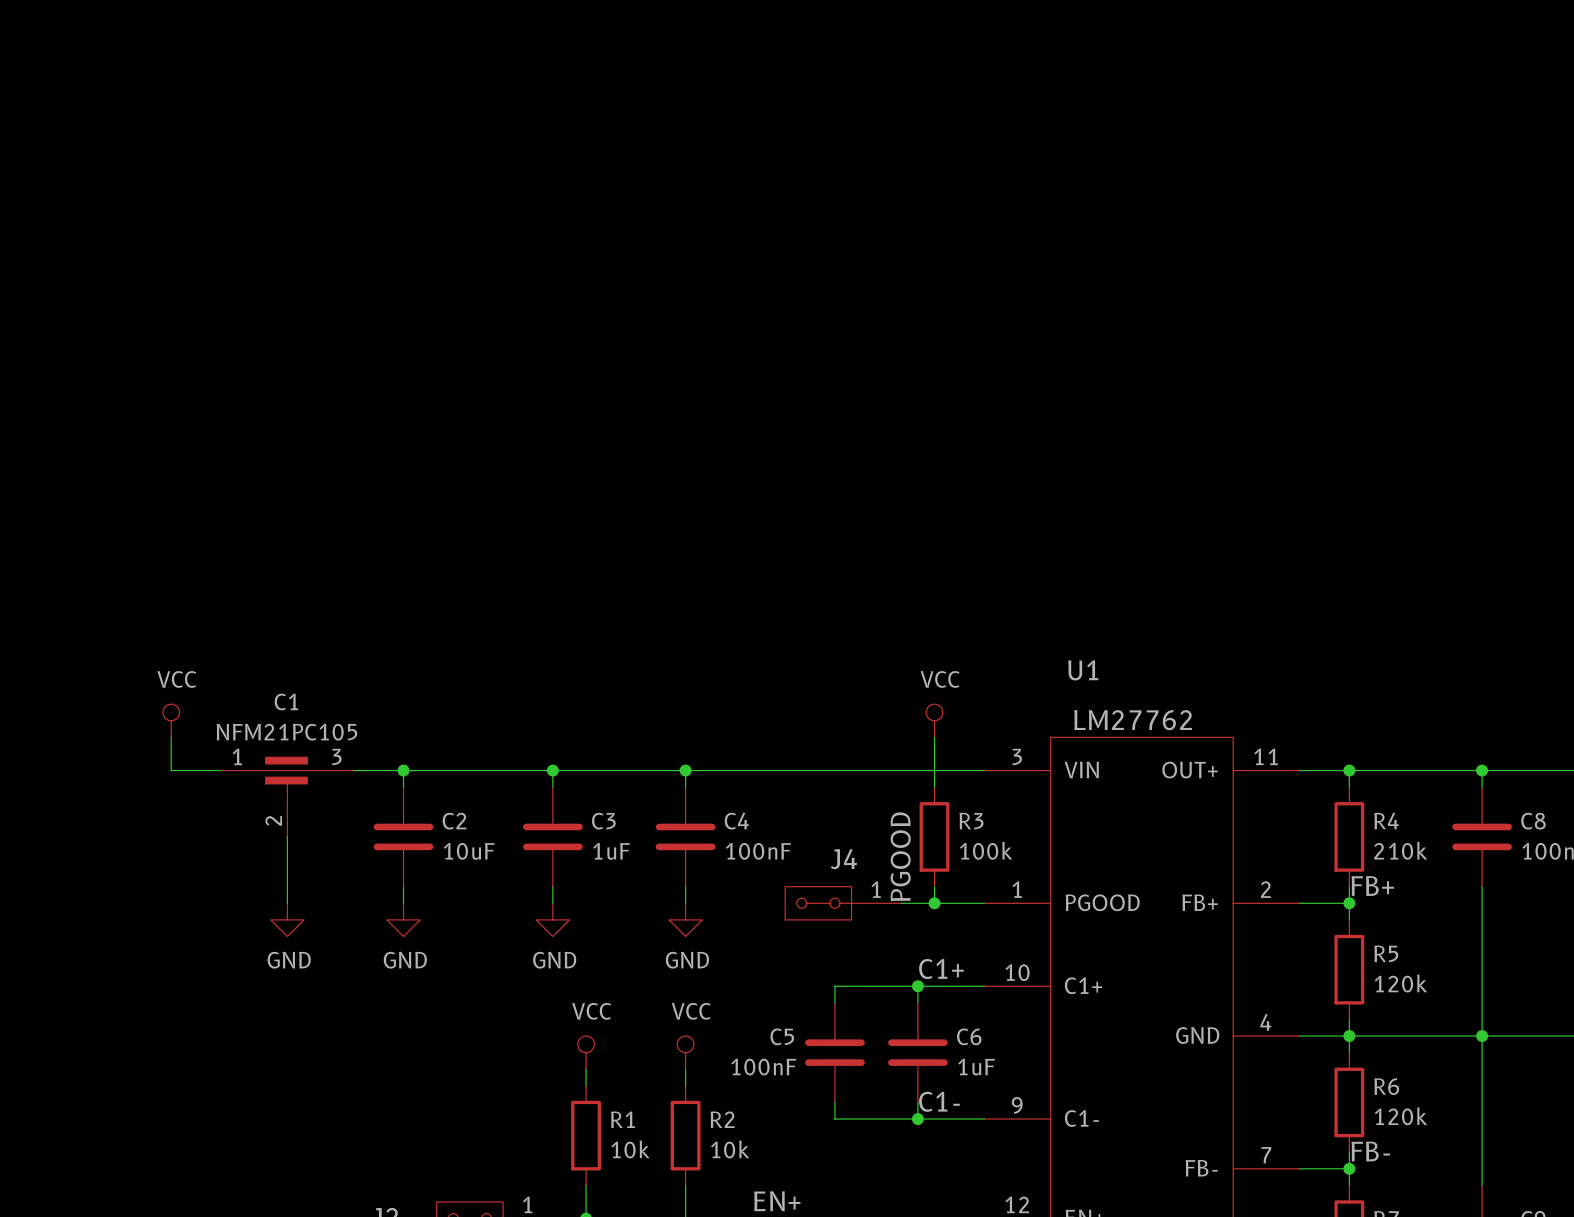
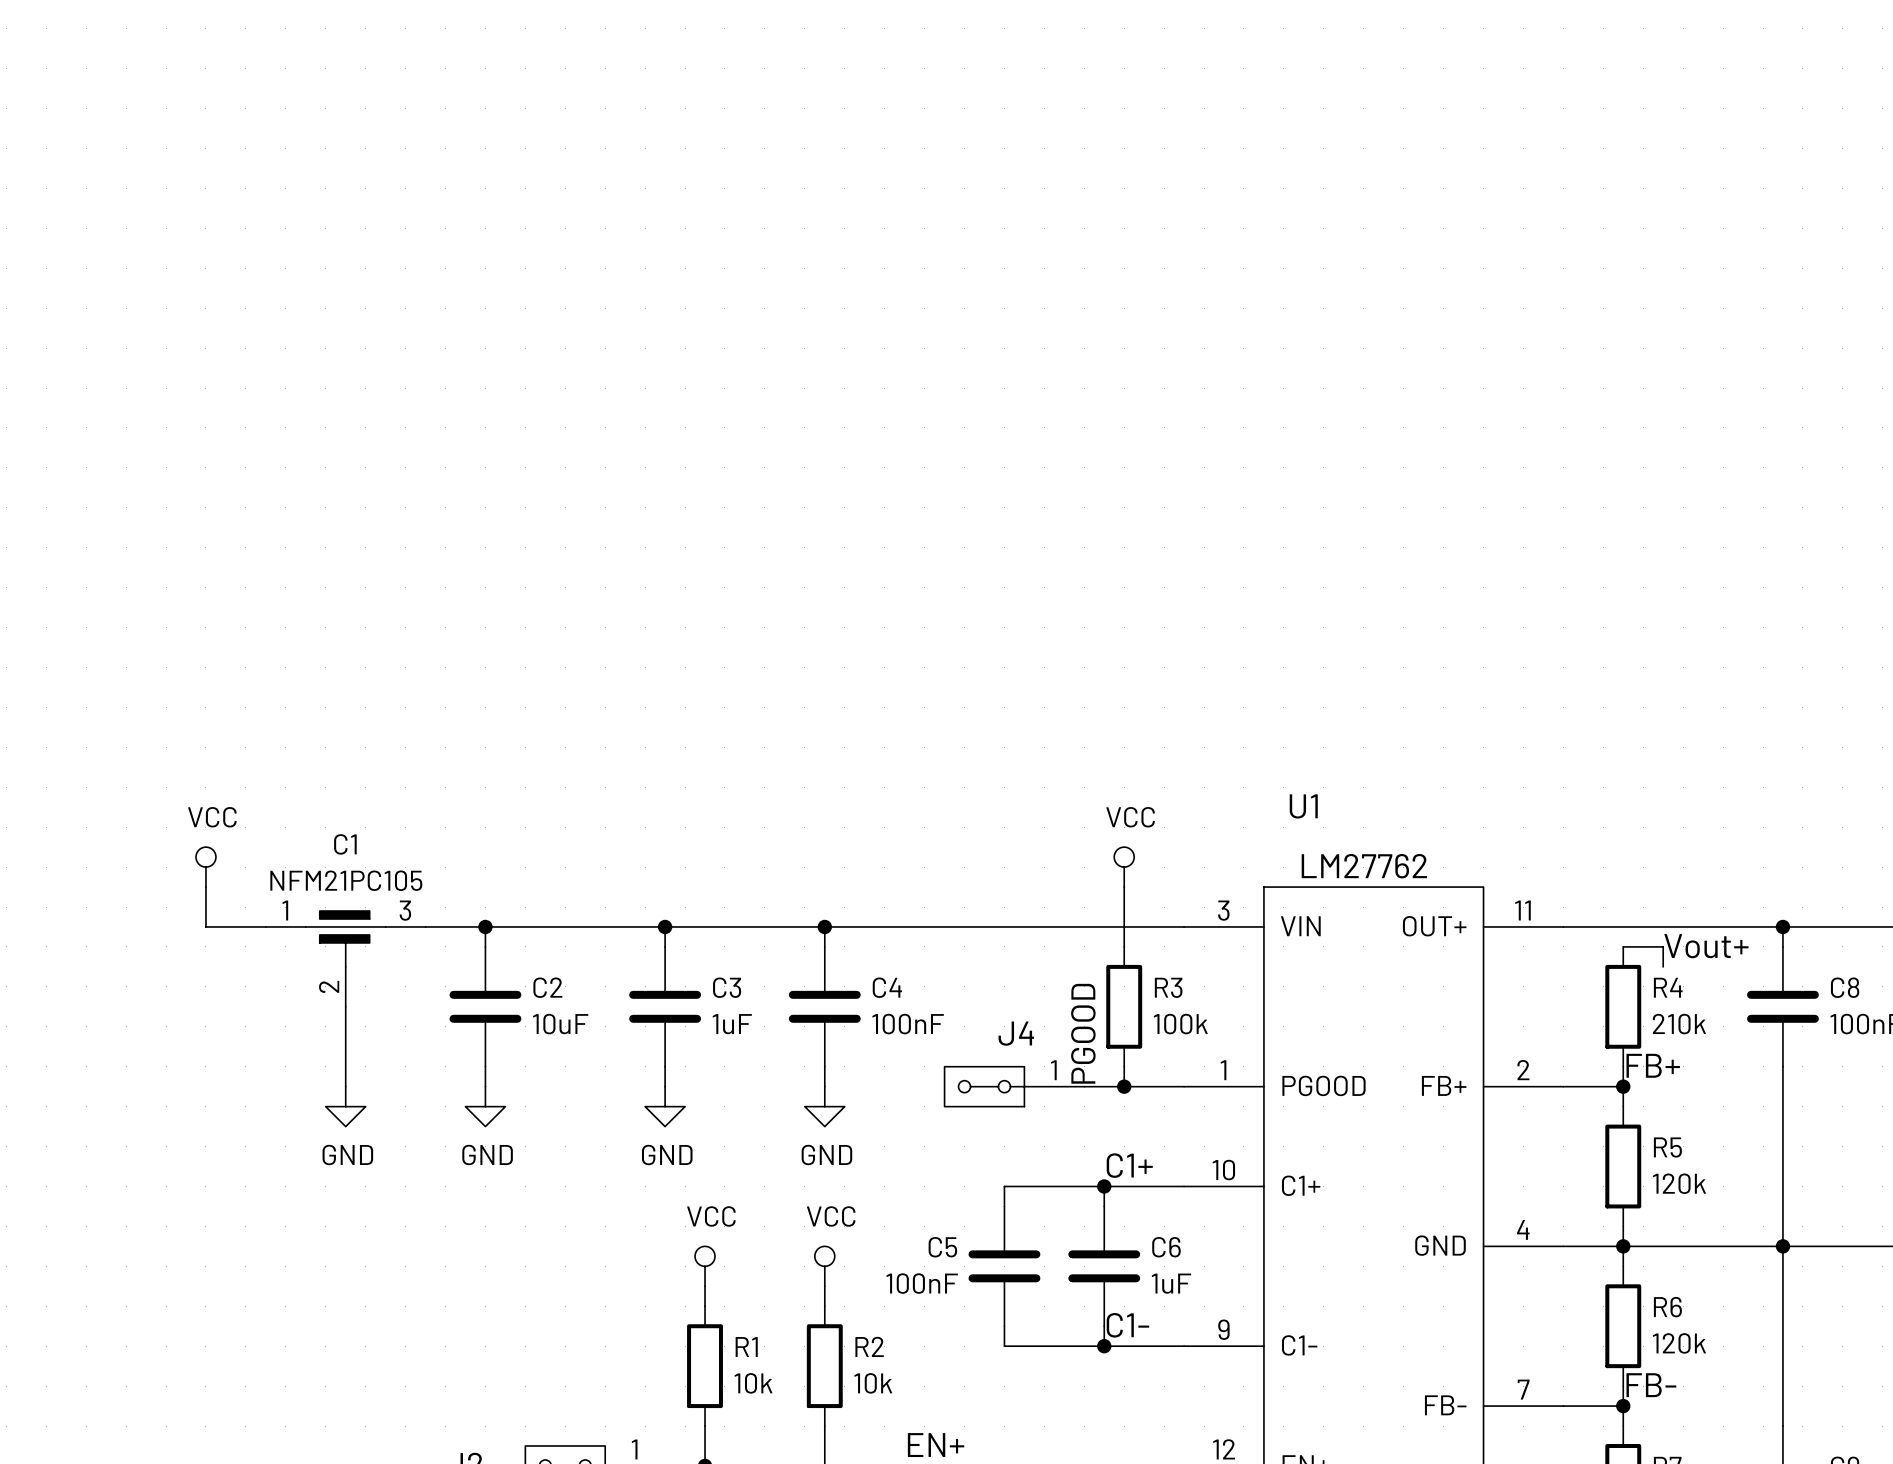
wire: (1349, 770) (1349, 787) -> (1663, 966) (1663, 946) (1623, 946)
junction: (1349, 770) -> none
label: none -> Vout+ (1706, 946)

